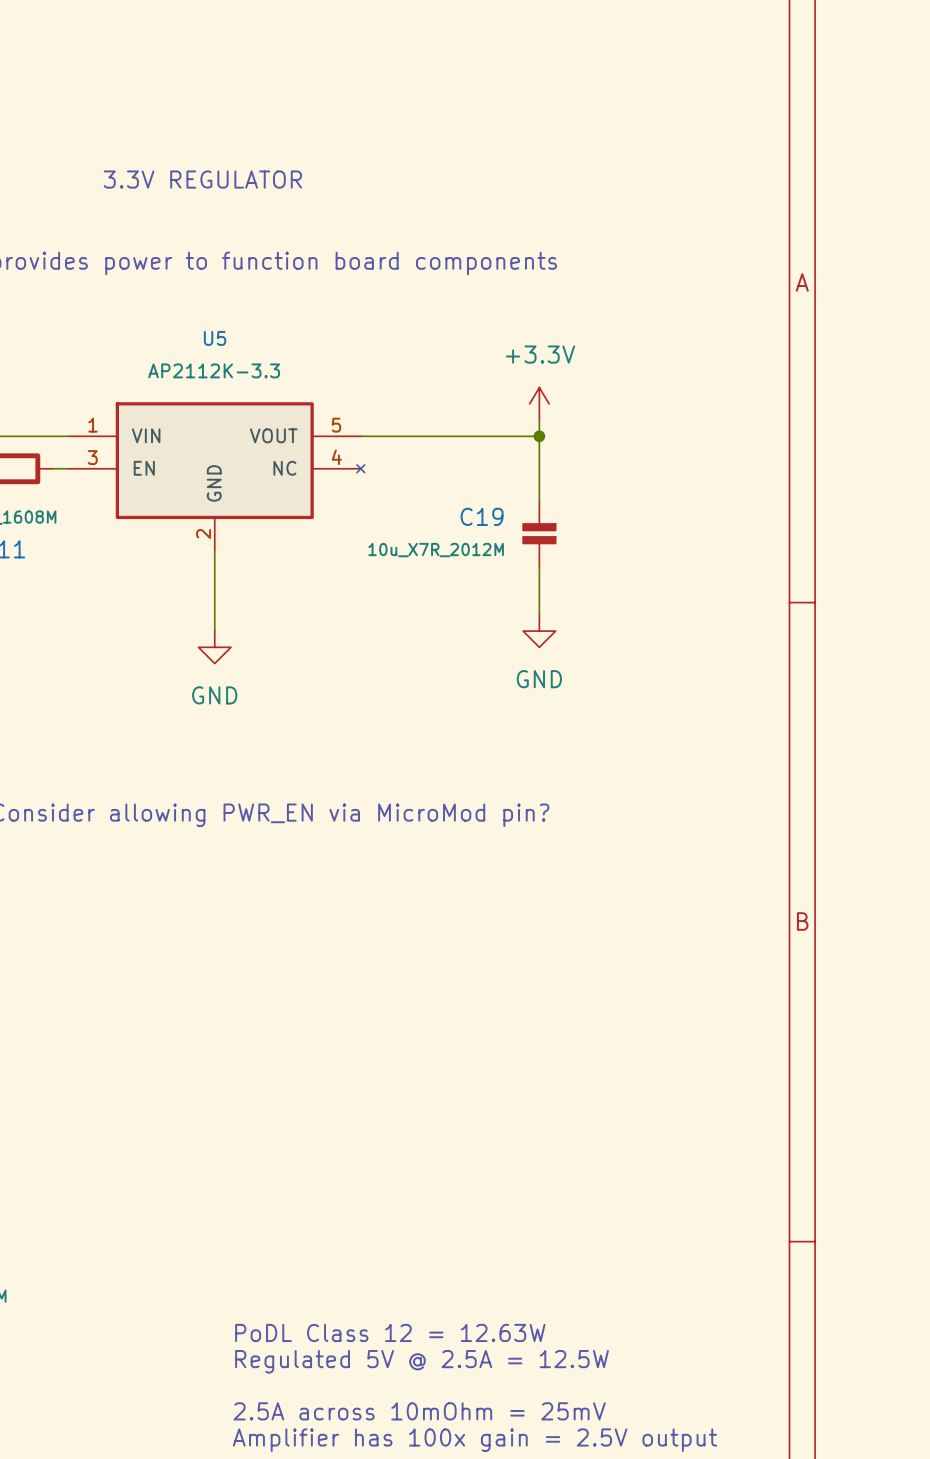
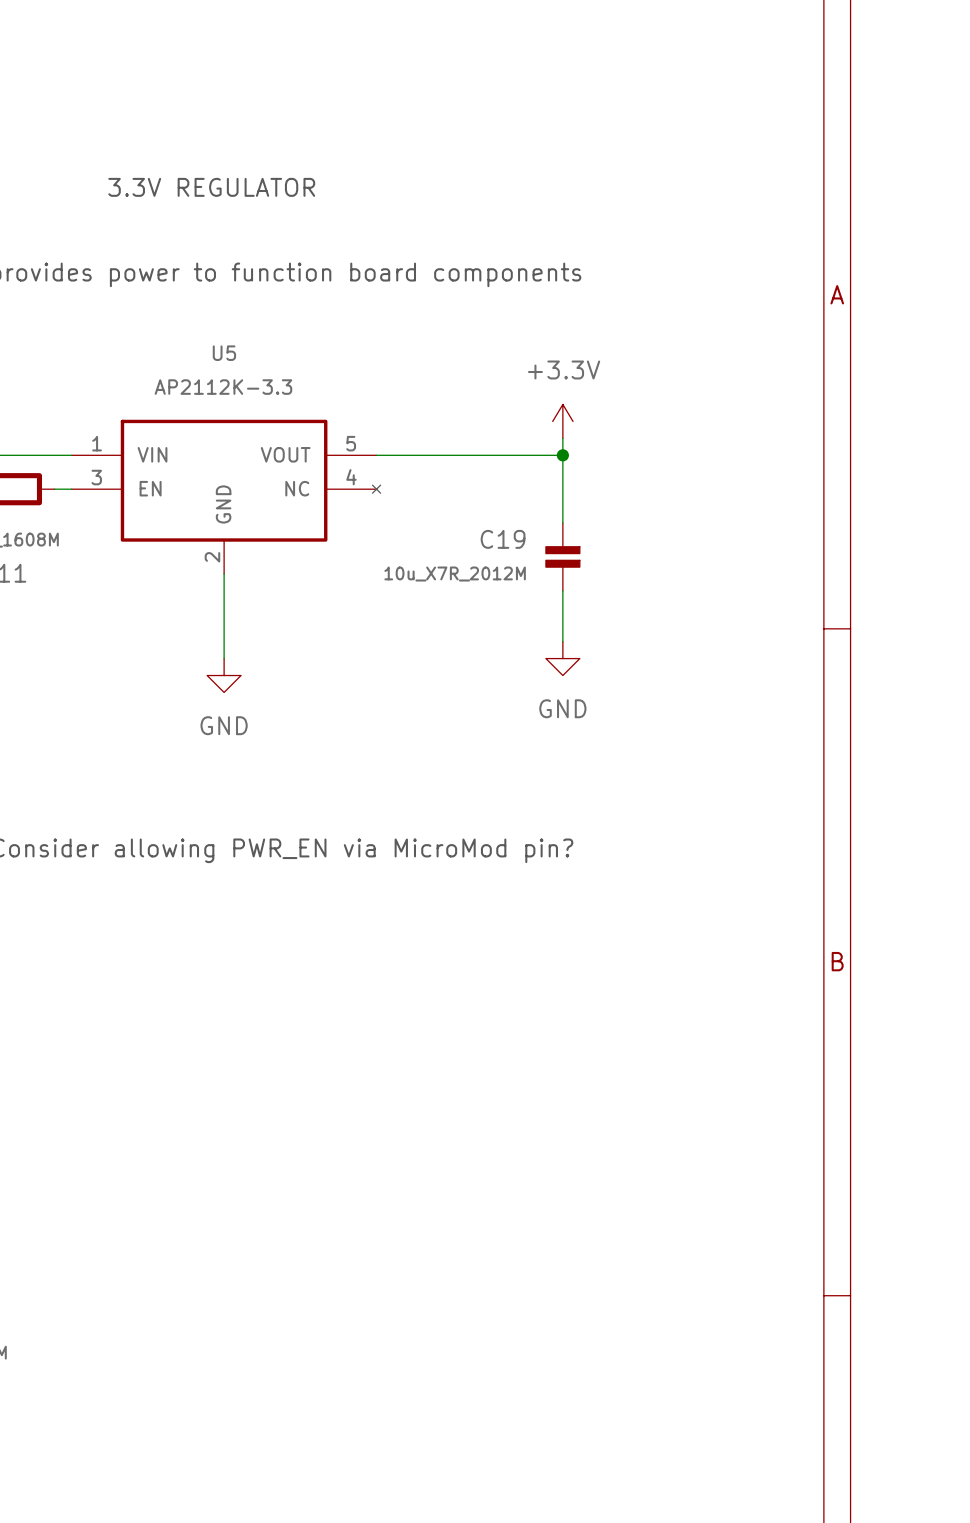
text: PoDL Class 12 = 12.63W (390, 1332) -> none
text: Regulated 5V @ 2.5A = 12.5W (422, 1361) -> none
text: 2.5A across 10mOhm = 25mV (419, 1411) -> none
text: Amplifier has 100x gain = 2.5V output (474, 1440) -> none

